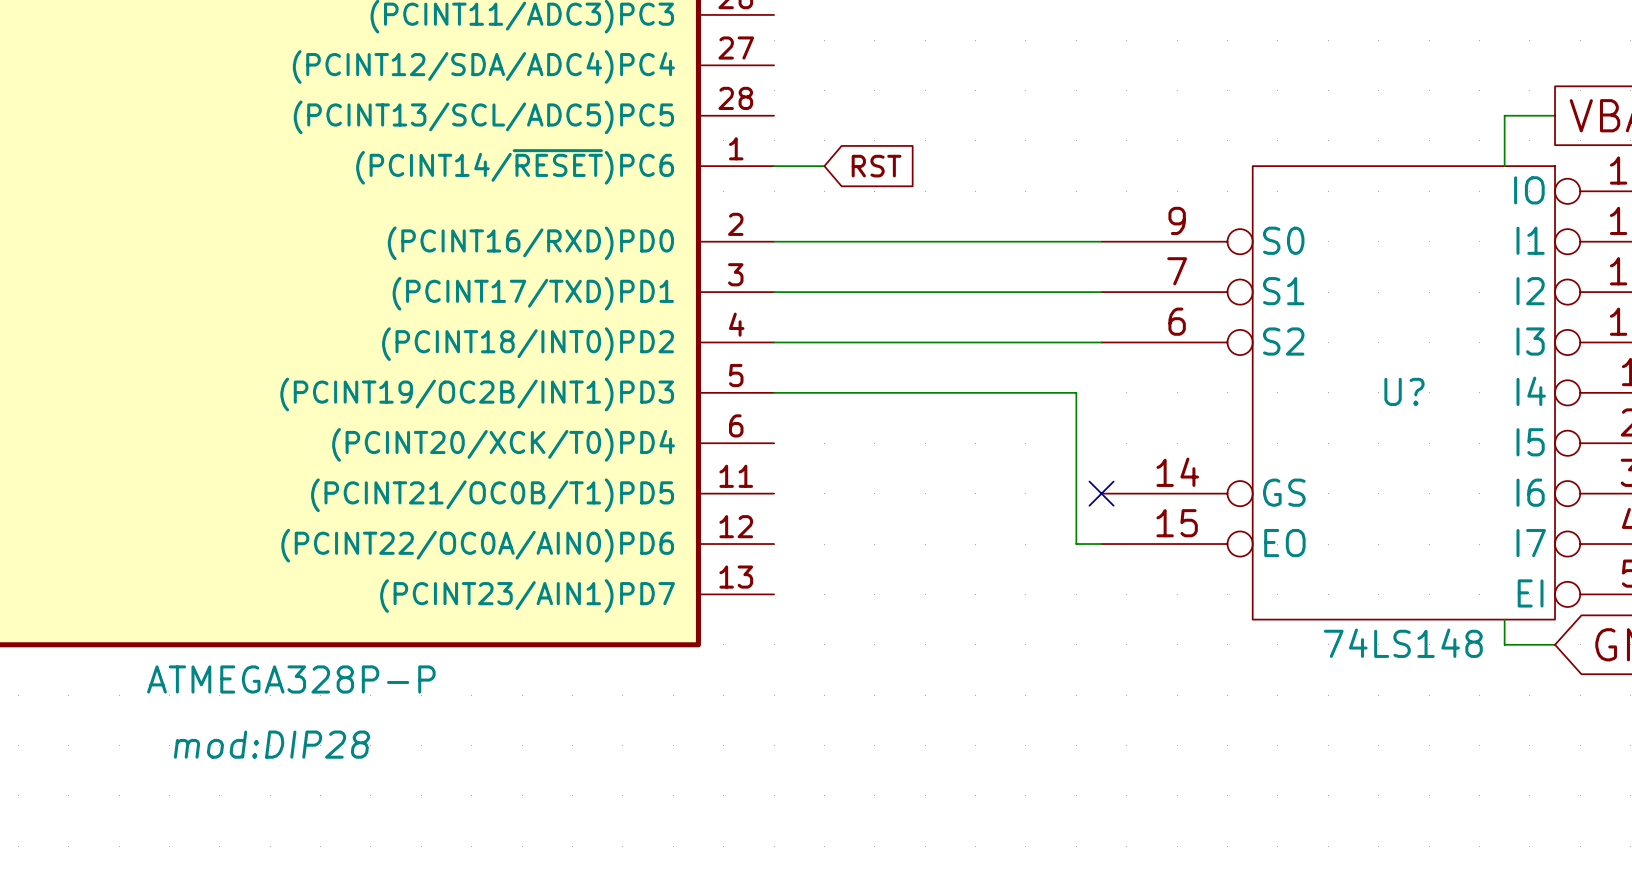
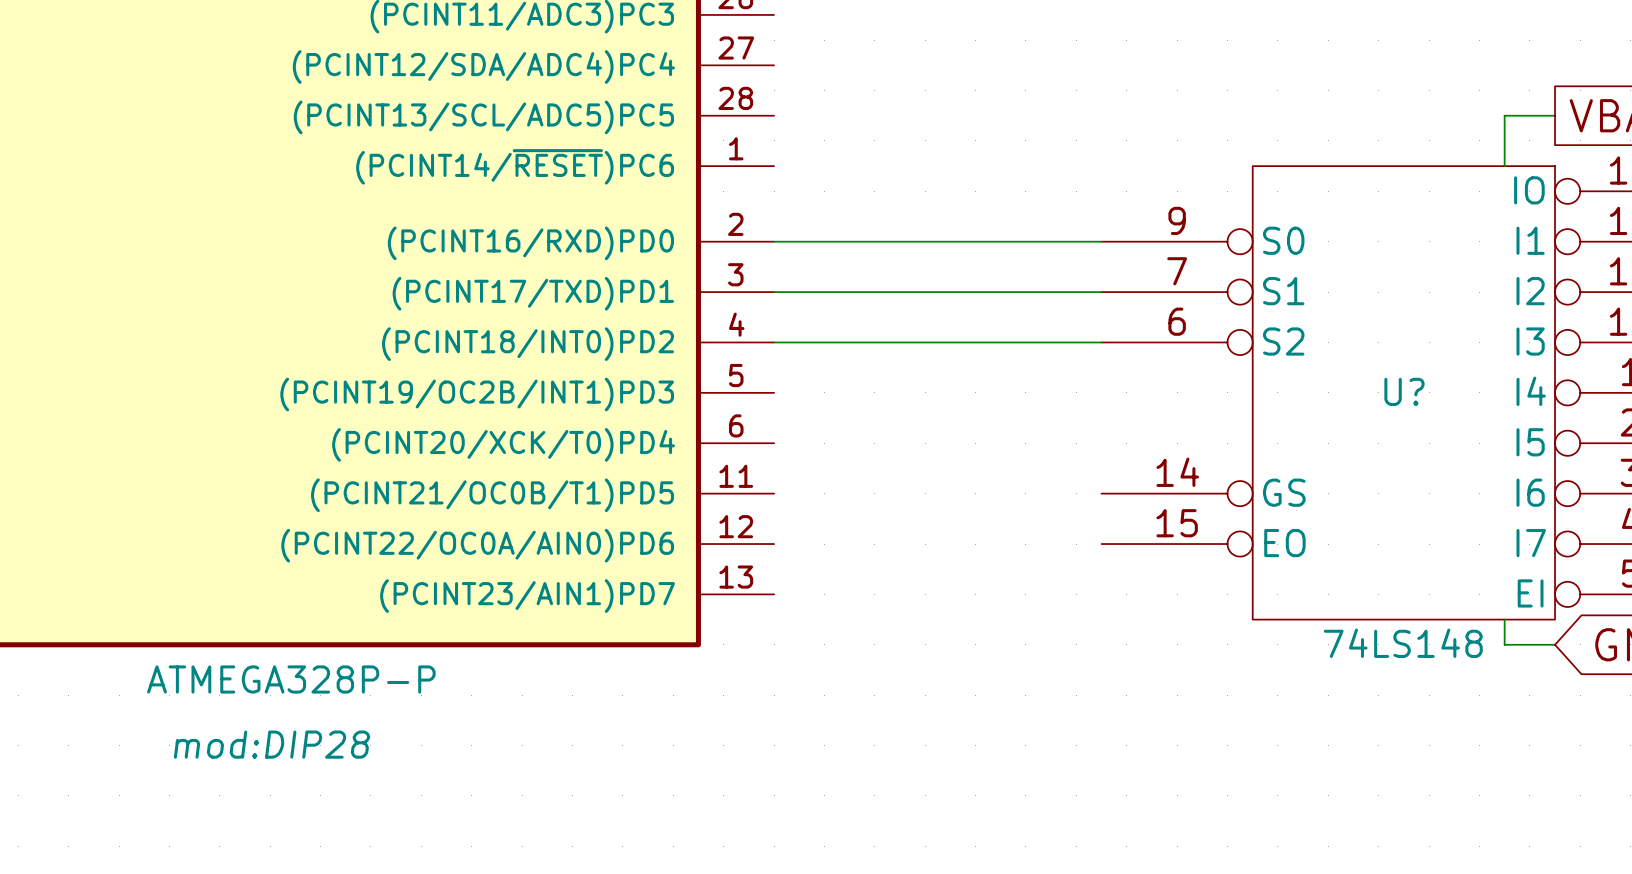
wire: (774, 166) (824, 166) -> none
global label: RST (876, 166) -> none
wire: (774, 392) (1076, 392) (1076, 544) (1101, 544) -> none
no-connect mark: (1101, 493) -> none

